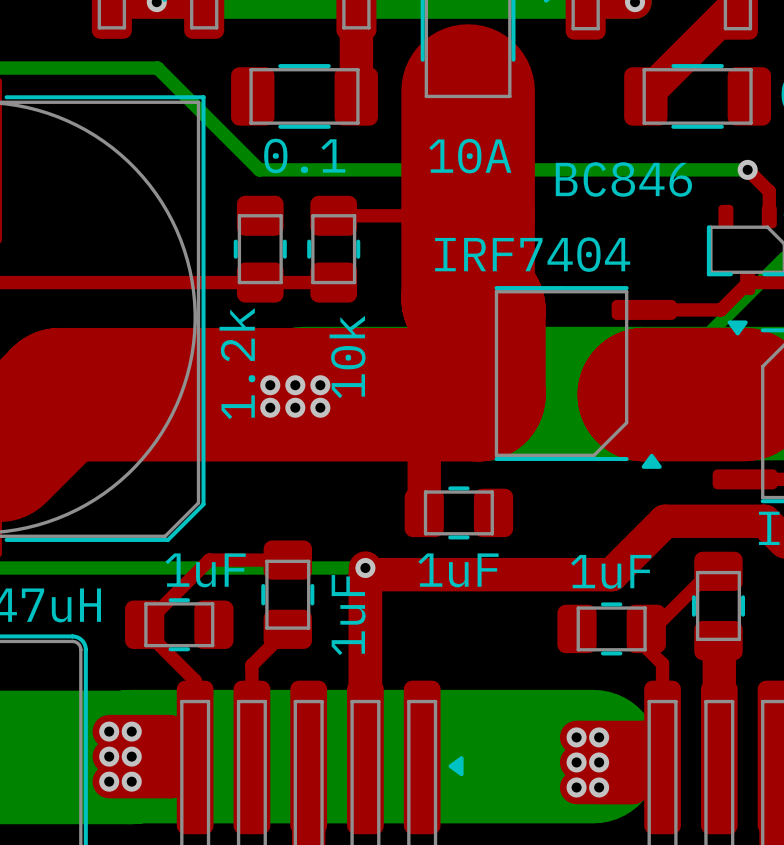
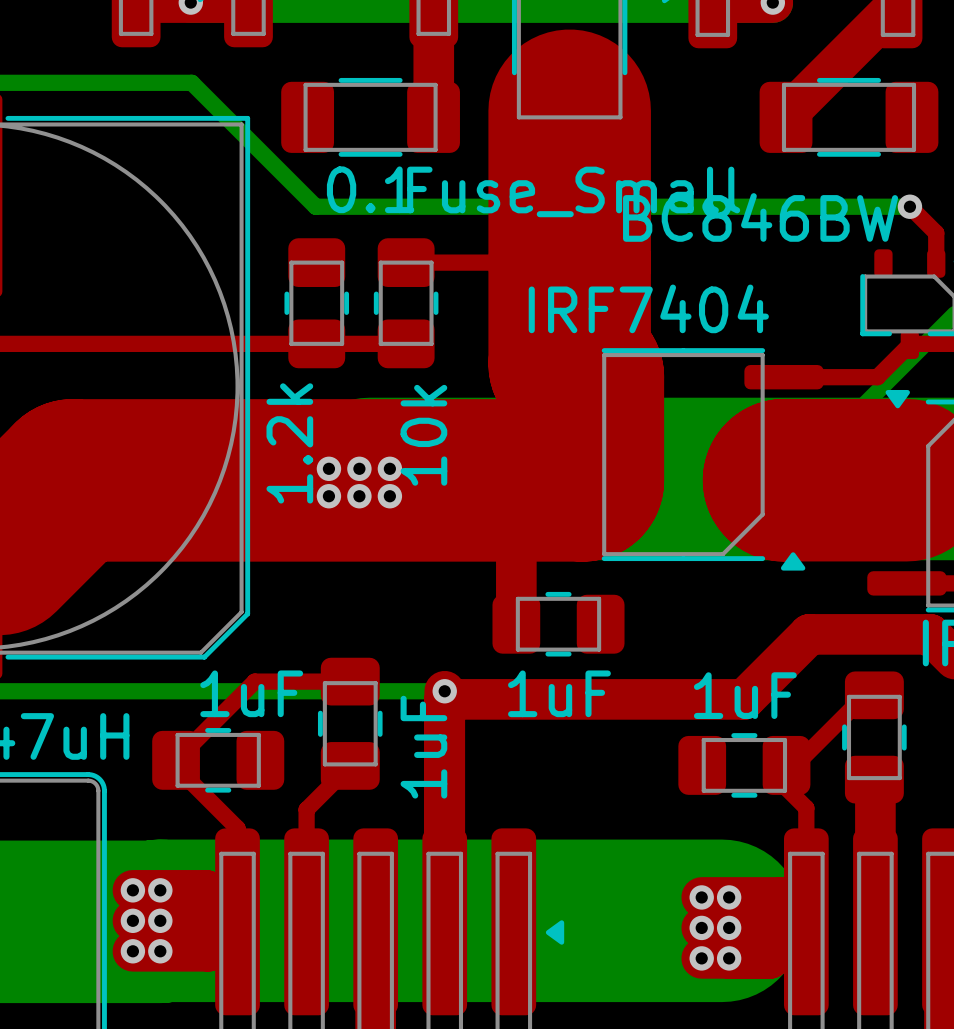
part value: 10A (470, 156) -> Fuse_Small (573, 191)
part value: BC846 (623, 179) -> BC846BW (760, 217)

